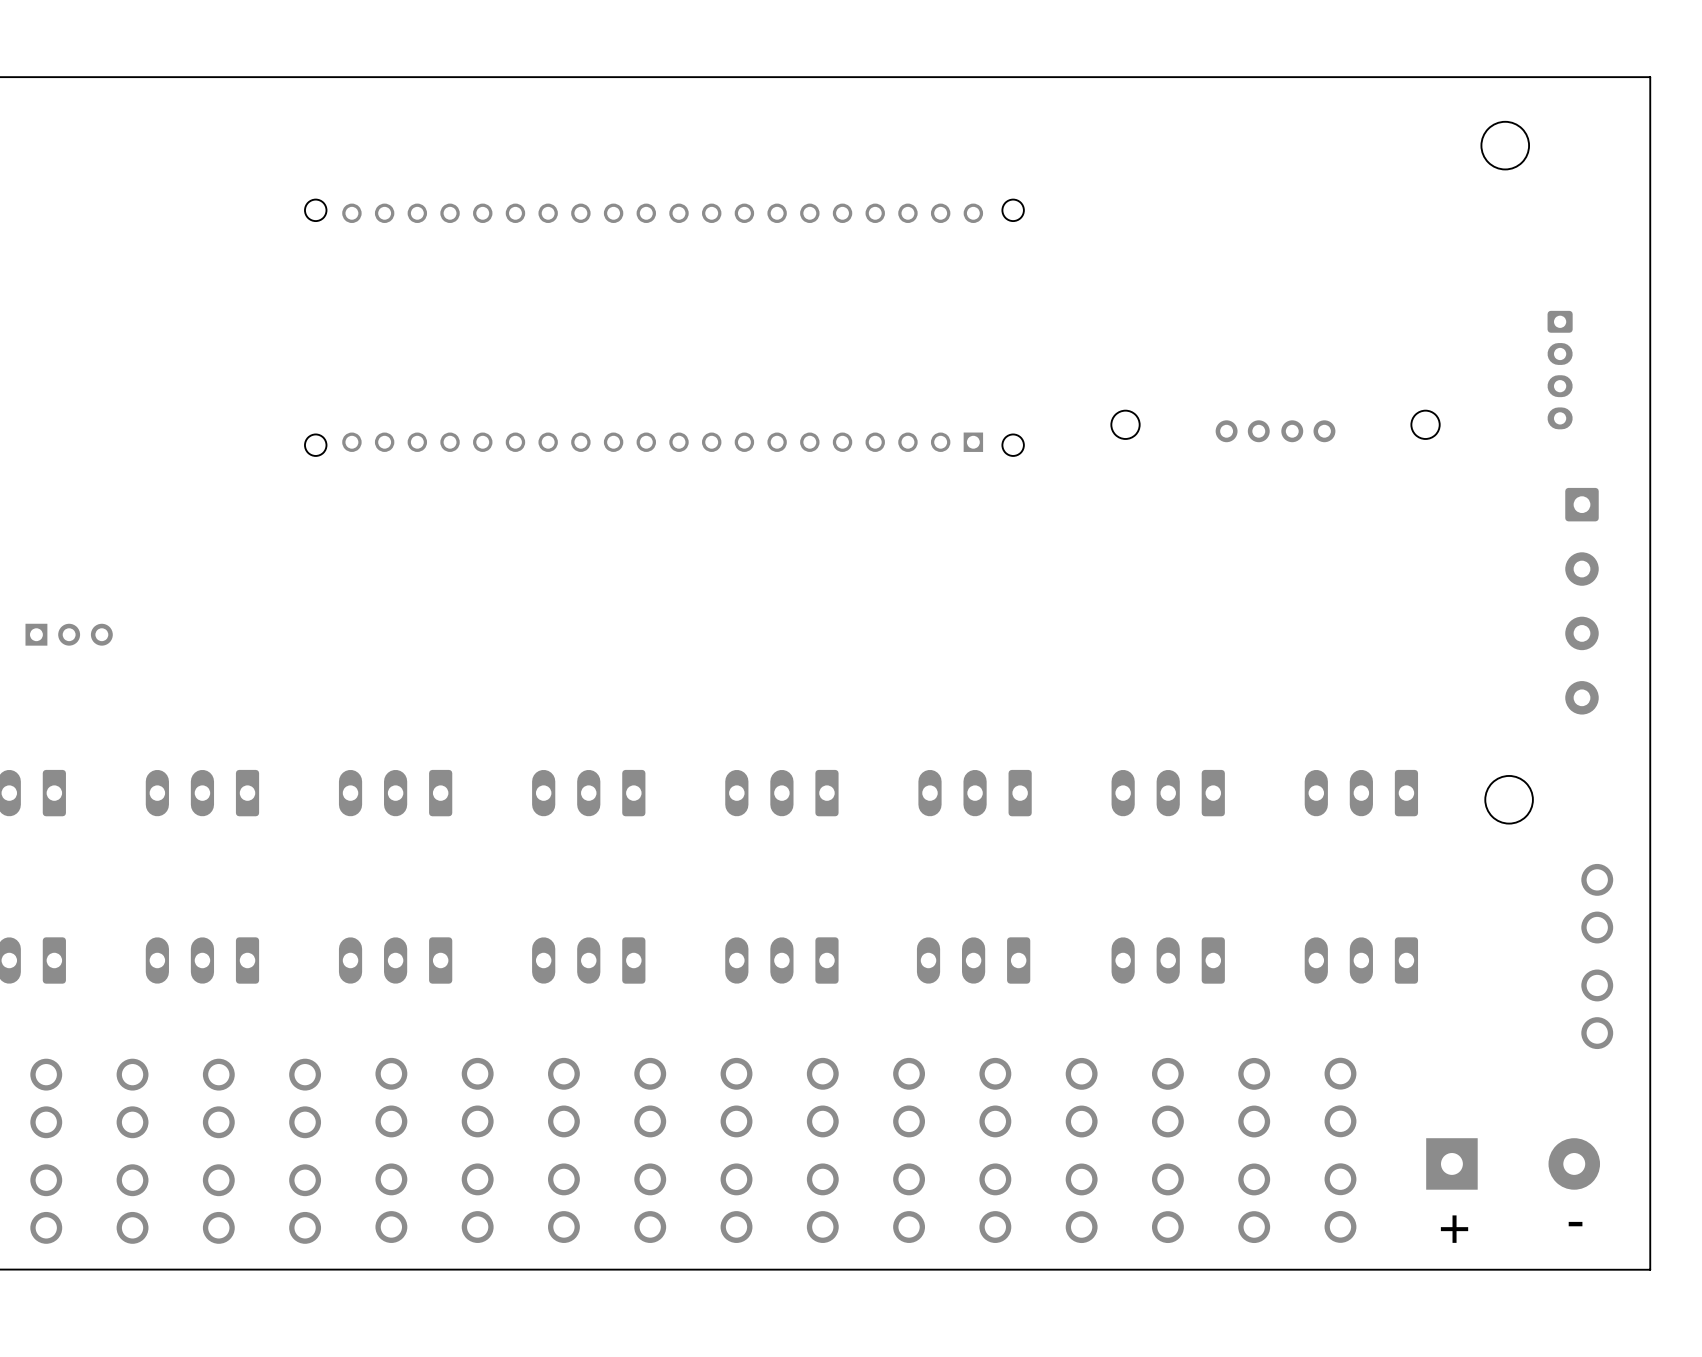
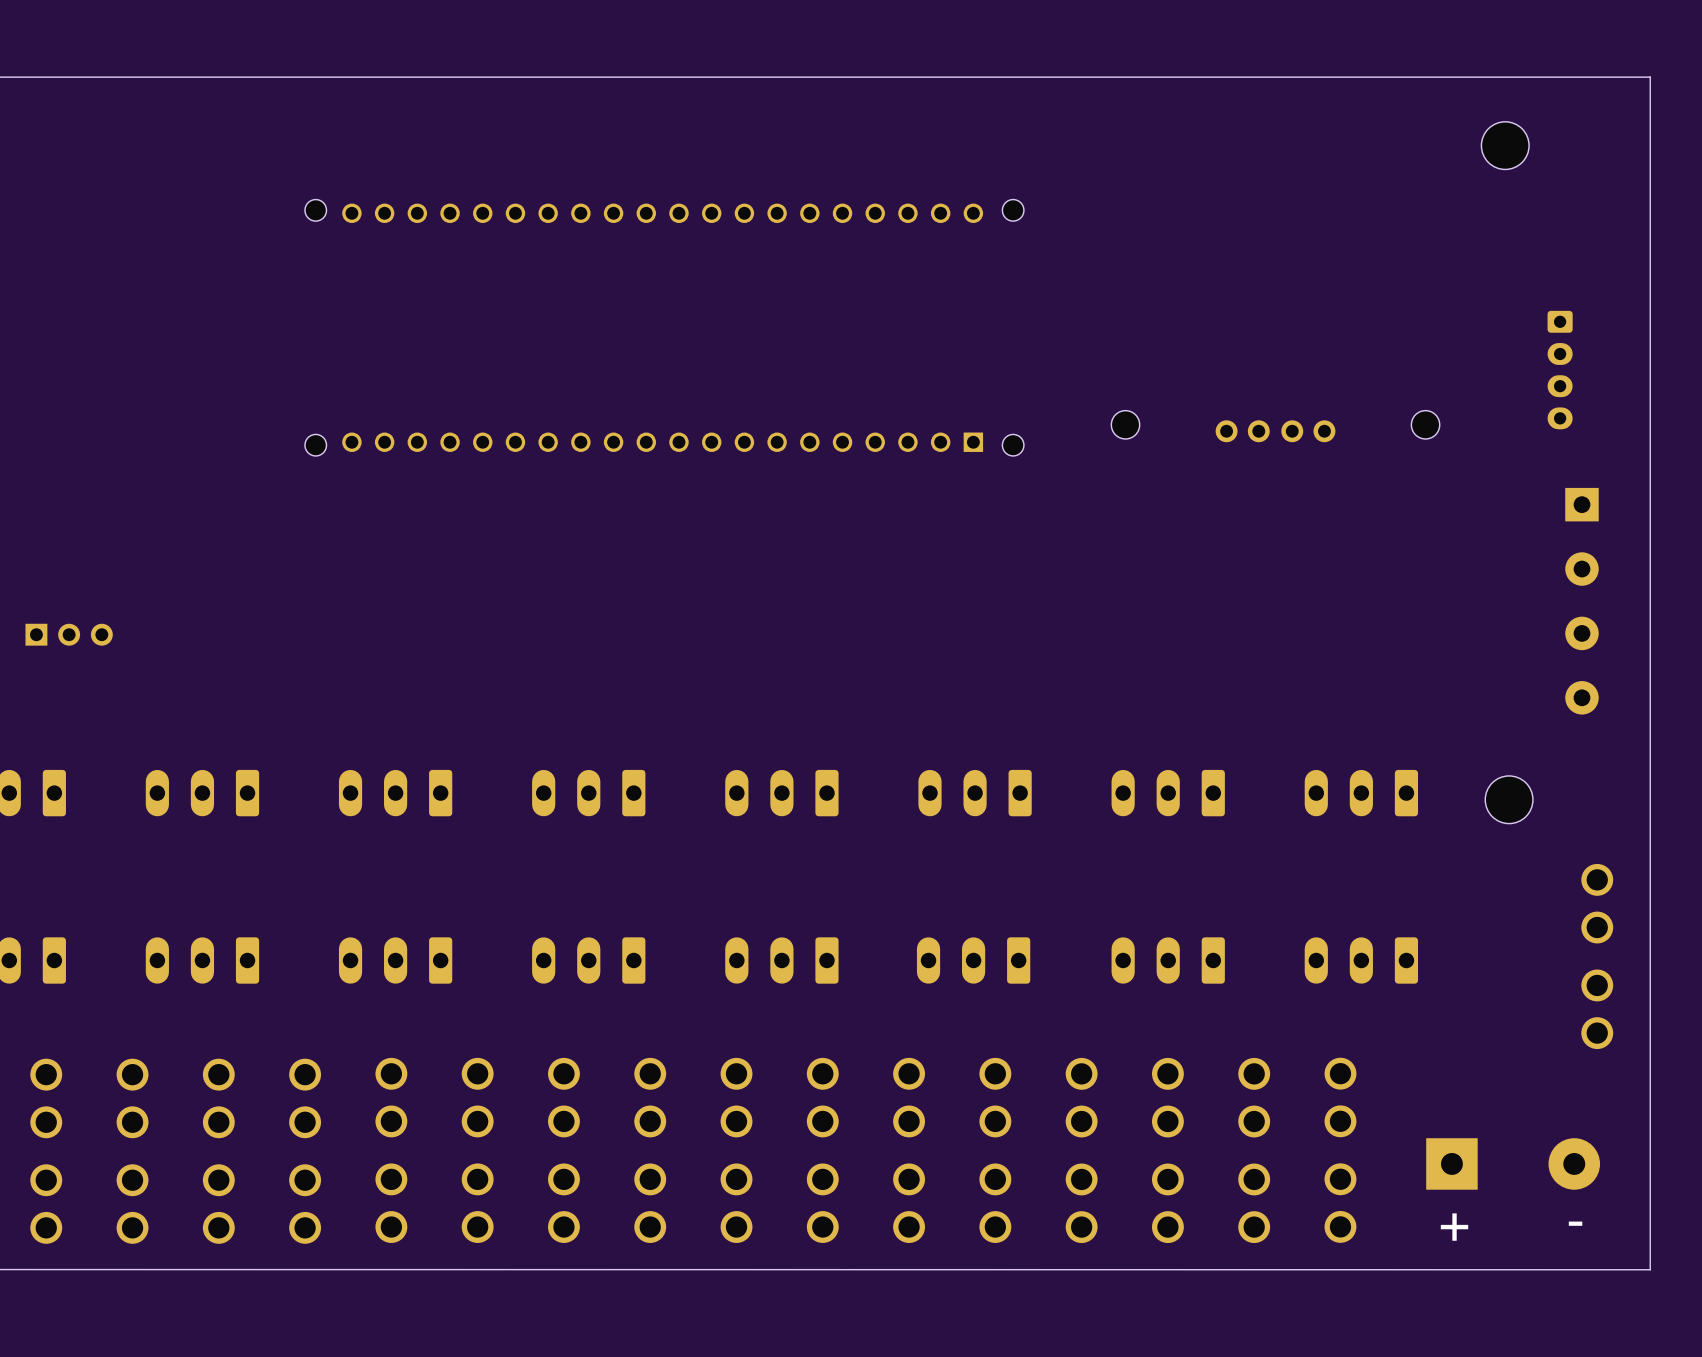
part footprint: [1565, 487, 1599, 715] -> [1565, 487, 1599, 715]

